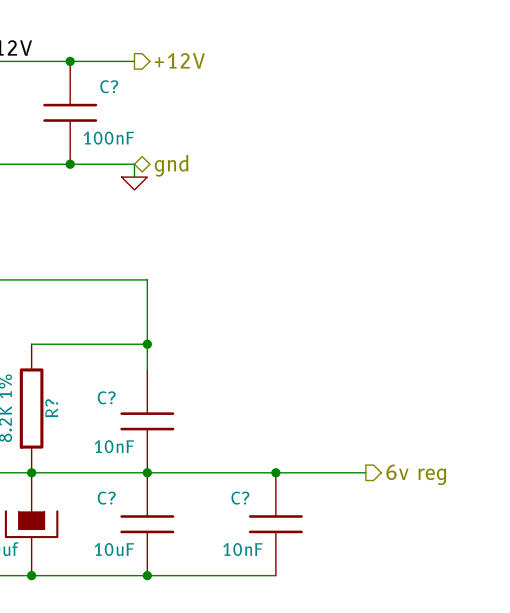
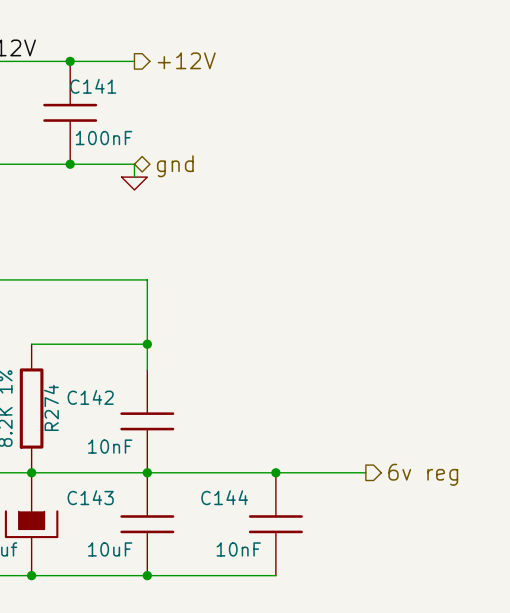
C? name: C? (109, 86) -> C141 (93, 86)
C? name: C? (106, 397) -> C142 (90, 397)
R? name: R? (51, 408) -> R274 (51, 407)
C? name: C? (106, 498) -> C143 (90, 497)
C? name: C? (240, 498) -> C144 (224, 497)

